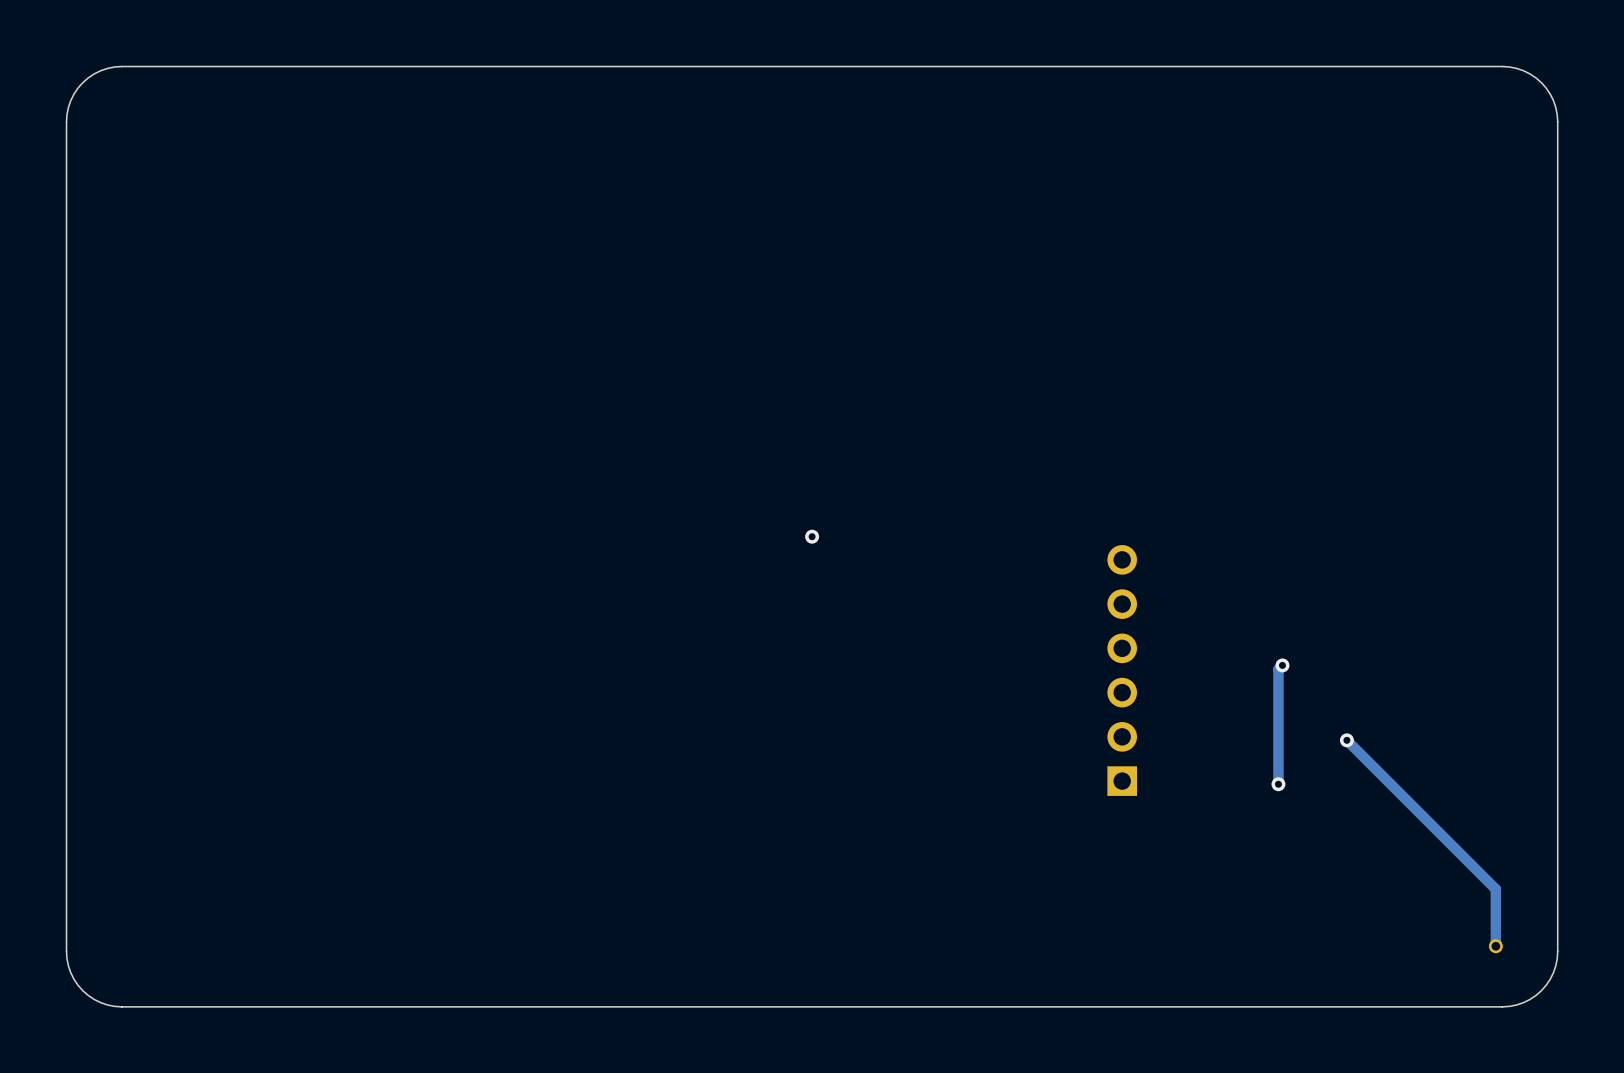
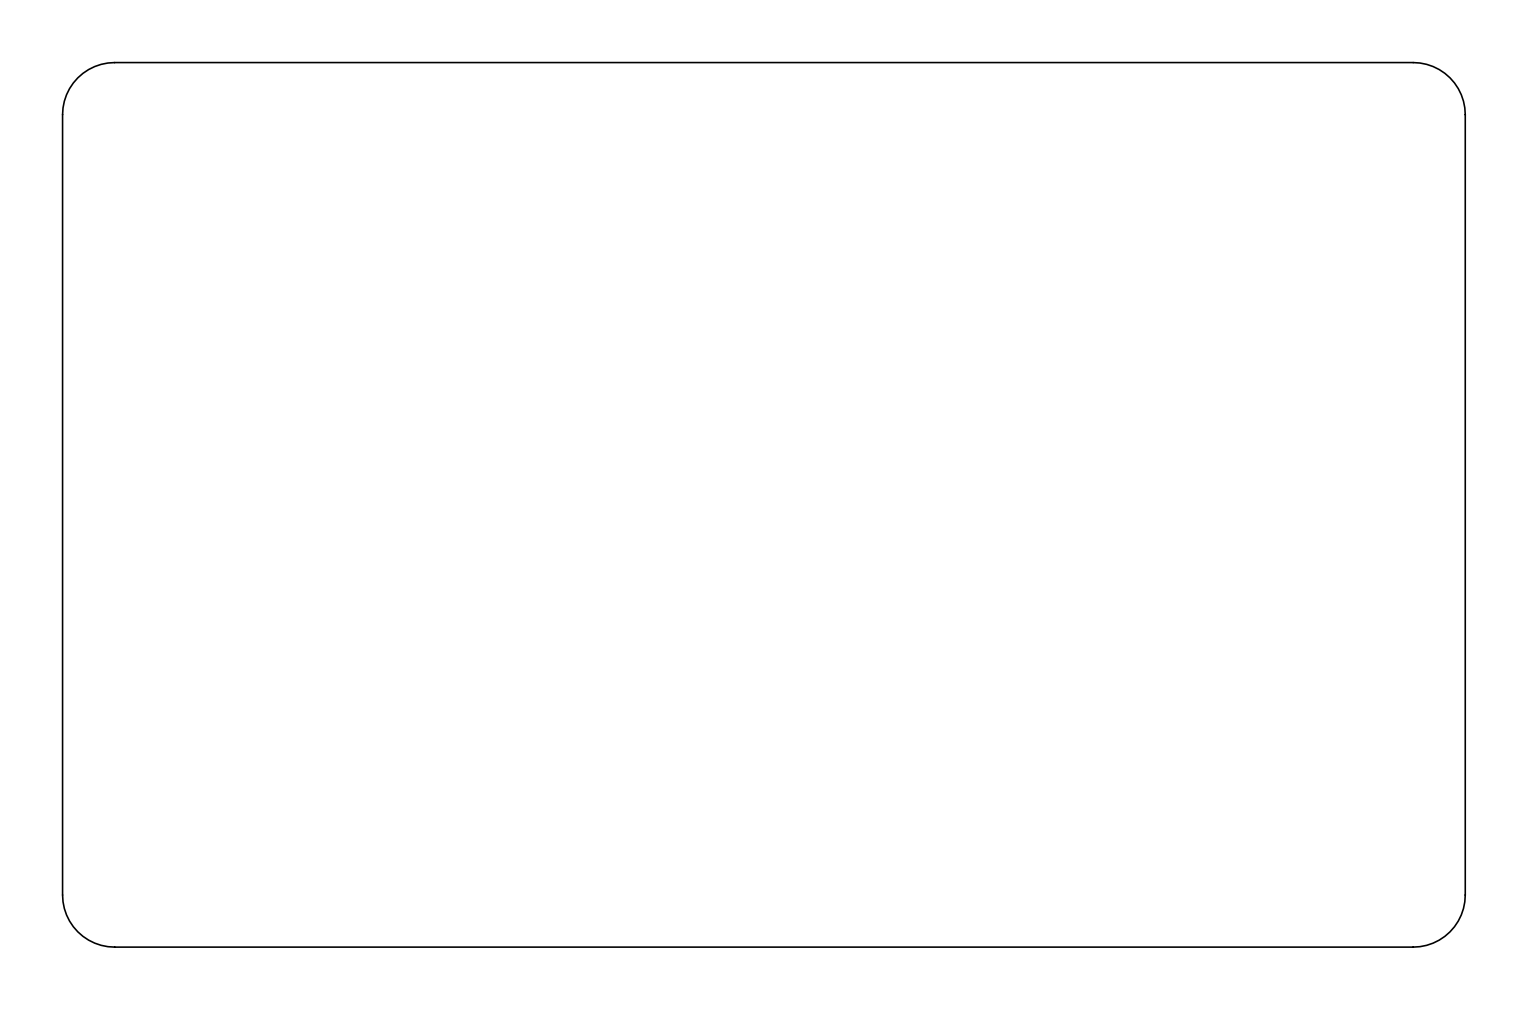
via: (812, 536) -> none
track: (1282, 665) (1278, 669) (1278, 784) -> none
via: (1282, 665) -> none
part: (1122, 670) -> none
track: (1346, 740) (1495, 889) (1495, 946) -> none
via: (1346, 740) -> none
via: (1278, 784) -> none
part: (1495, 946) -> none

